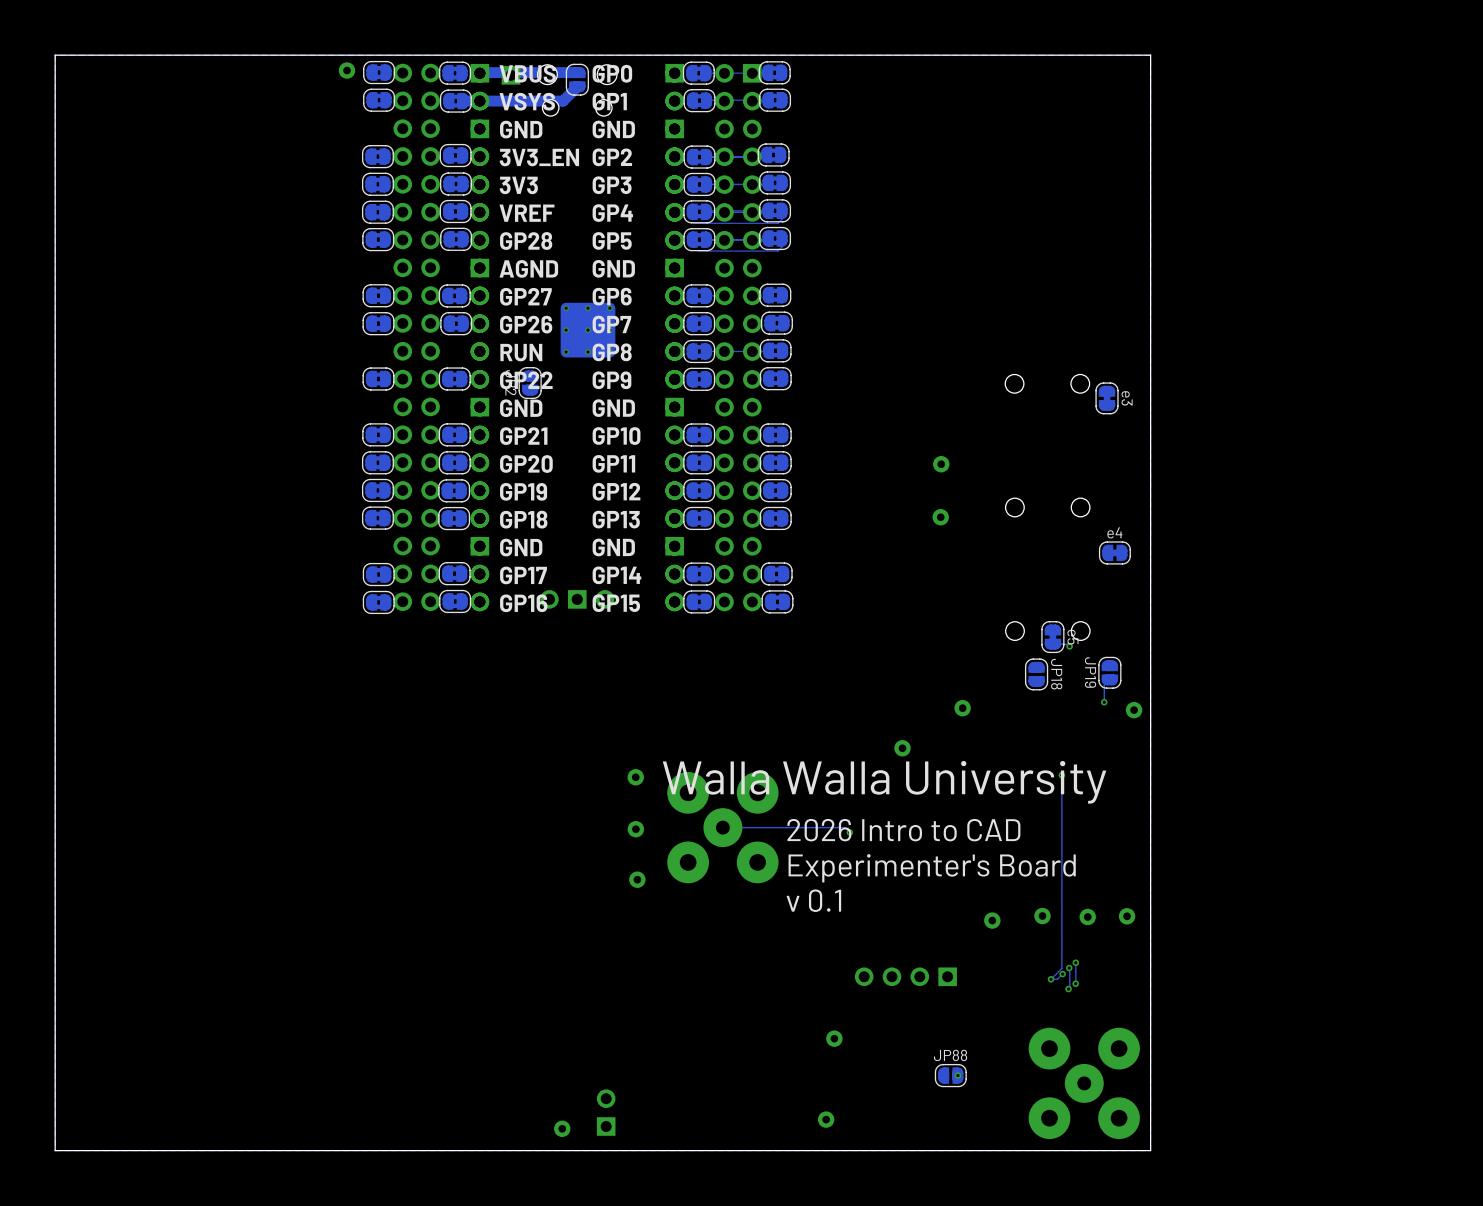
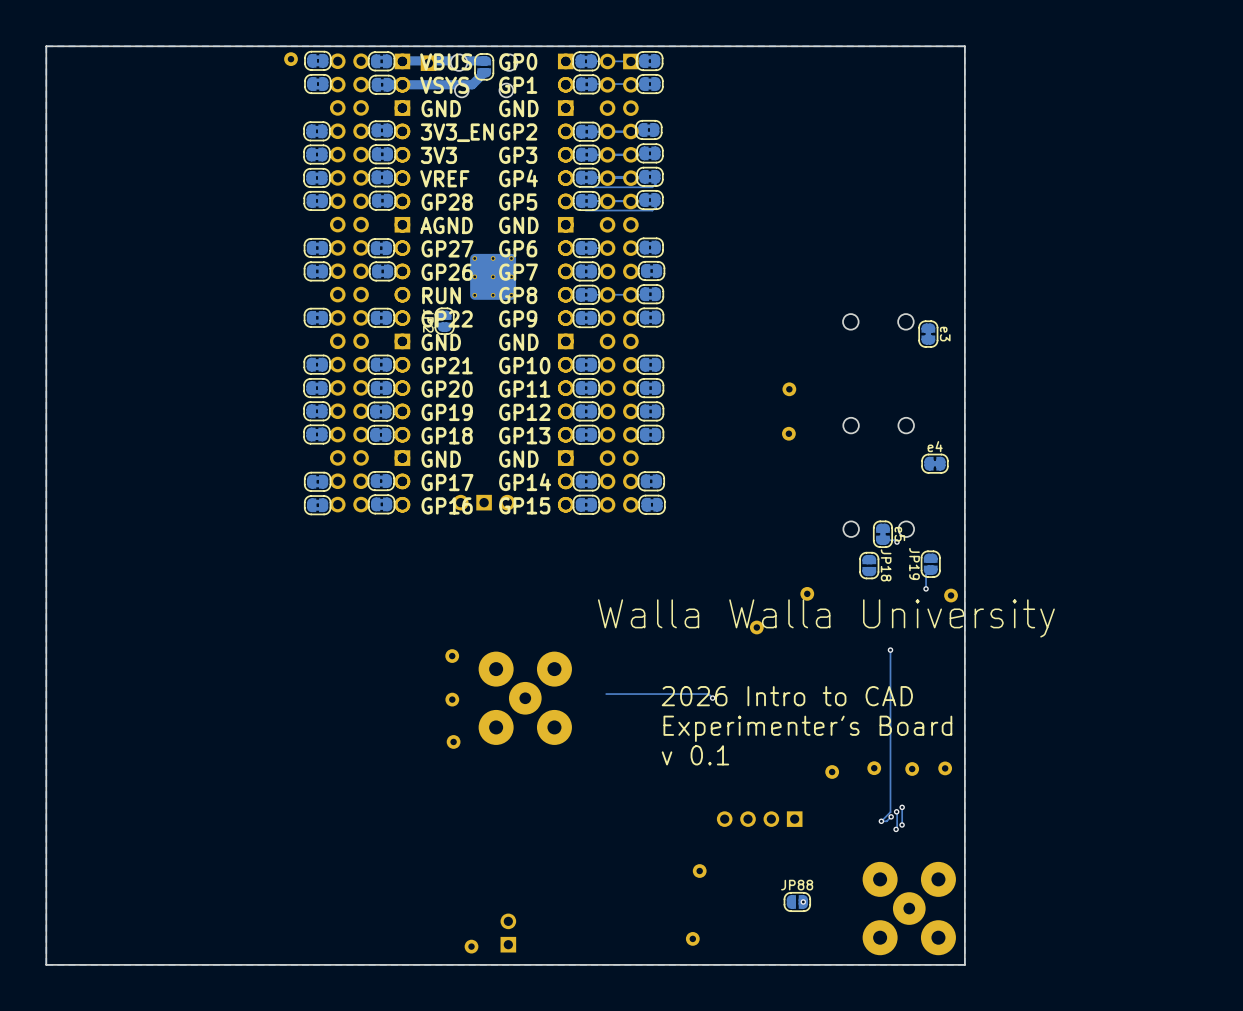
part: (635, 777) -> none
part: none -> (452, 656)
text position: Walla Walla University (884, 782) -> Walla Walla University (826, 618)
part footprint: [627, 820, 645, 838] -> [478, 651, 572, 745]
part: (722, 827) -> none
part: none -> (452, 699)
part: (637, 879) -> none
part: none -> (453, 741)

